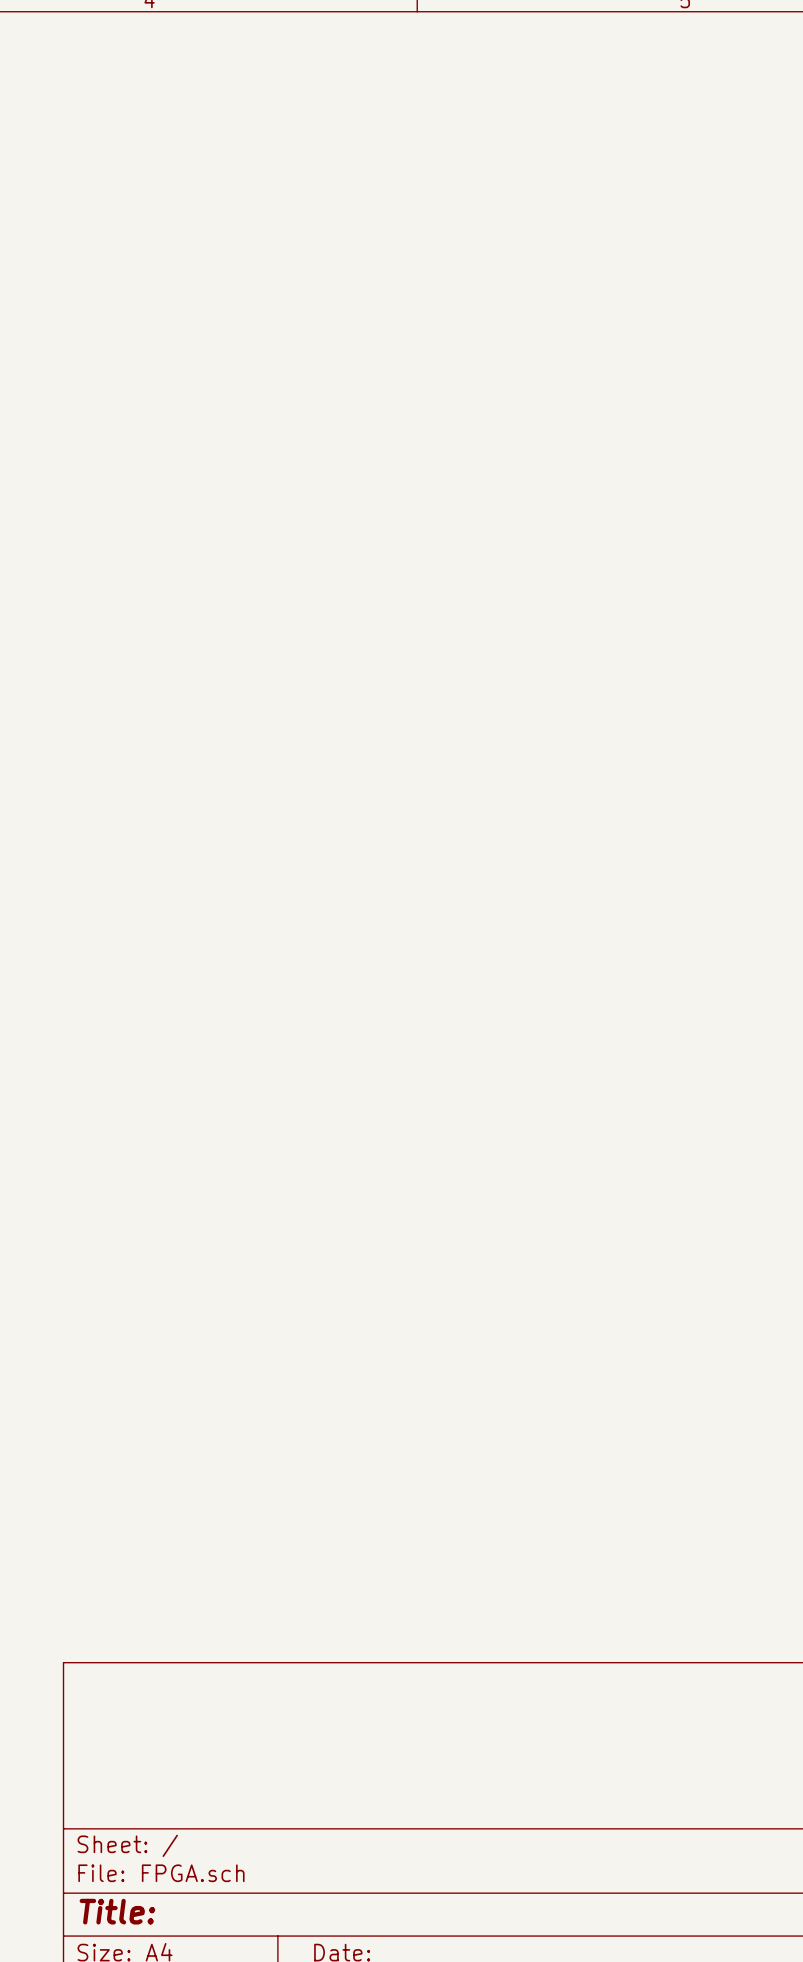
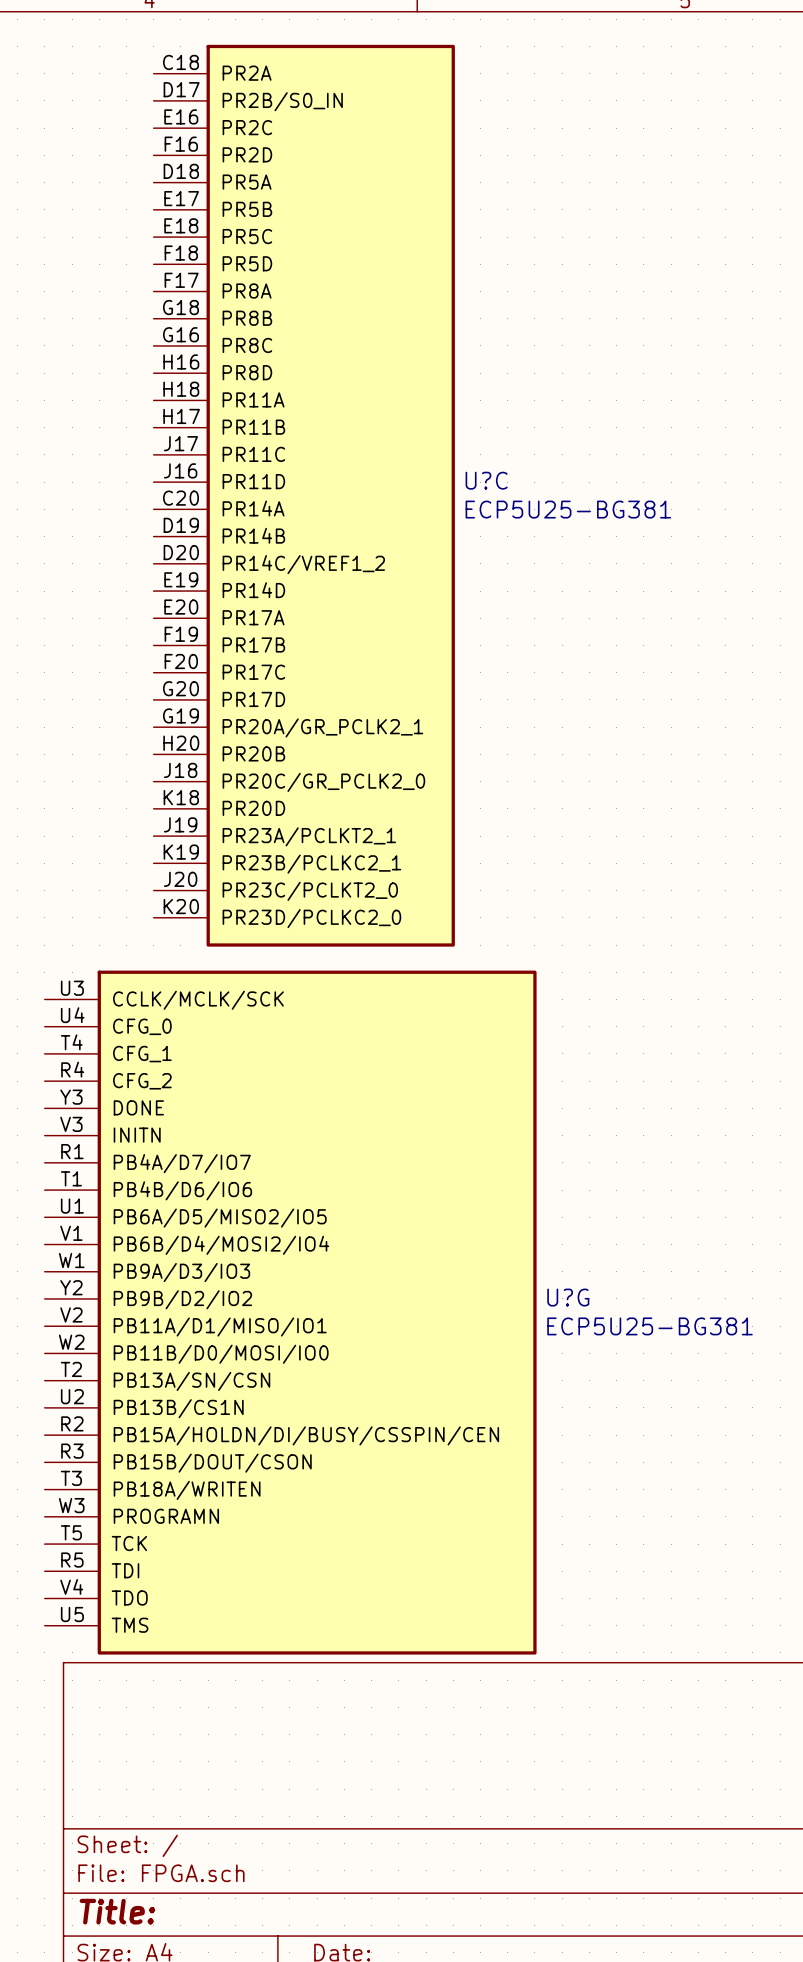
U?C: none -> ECP5U25-BG381 (304, 495)
U?G: none -> ECP5U25-BG381 (290, 1312)

